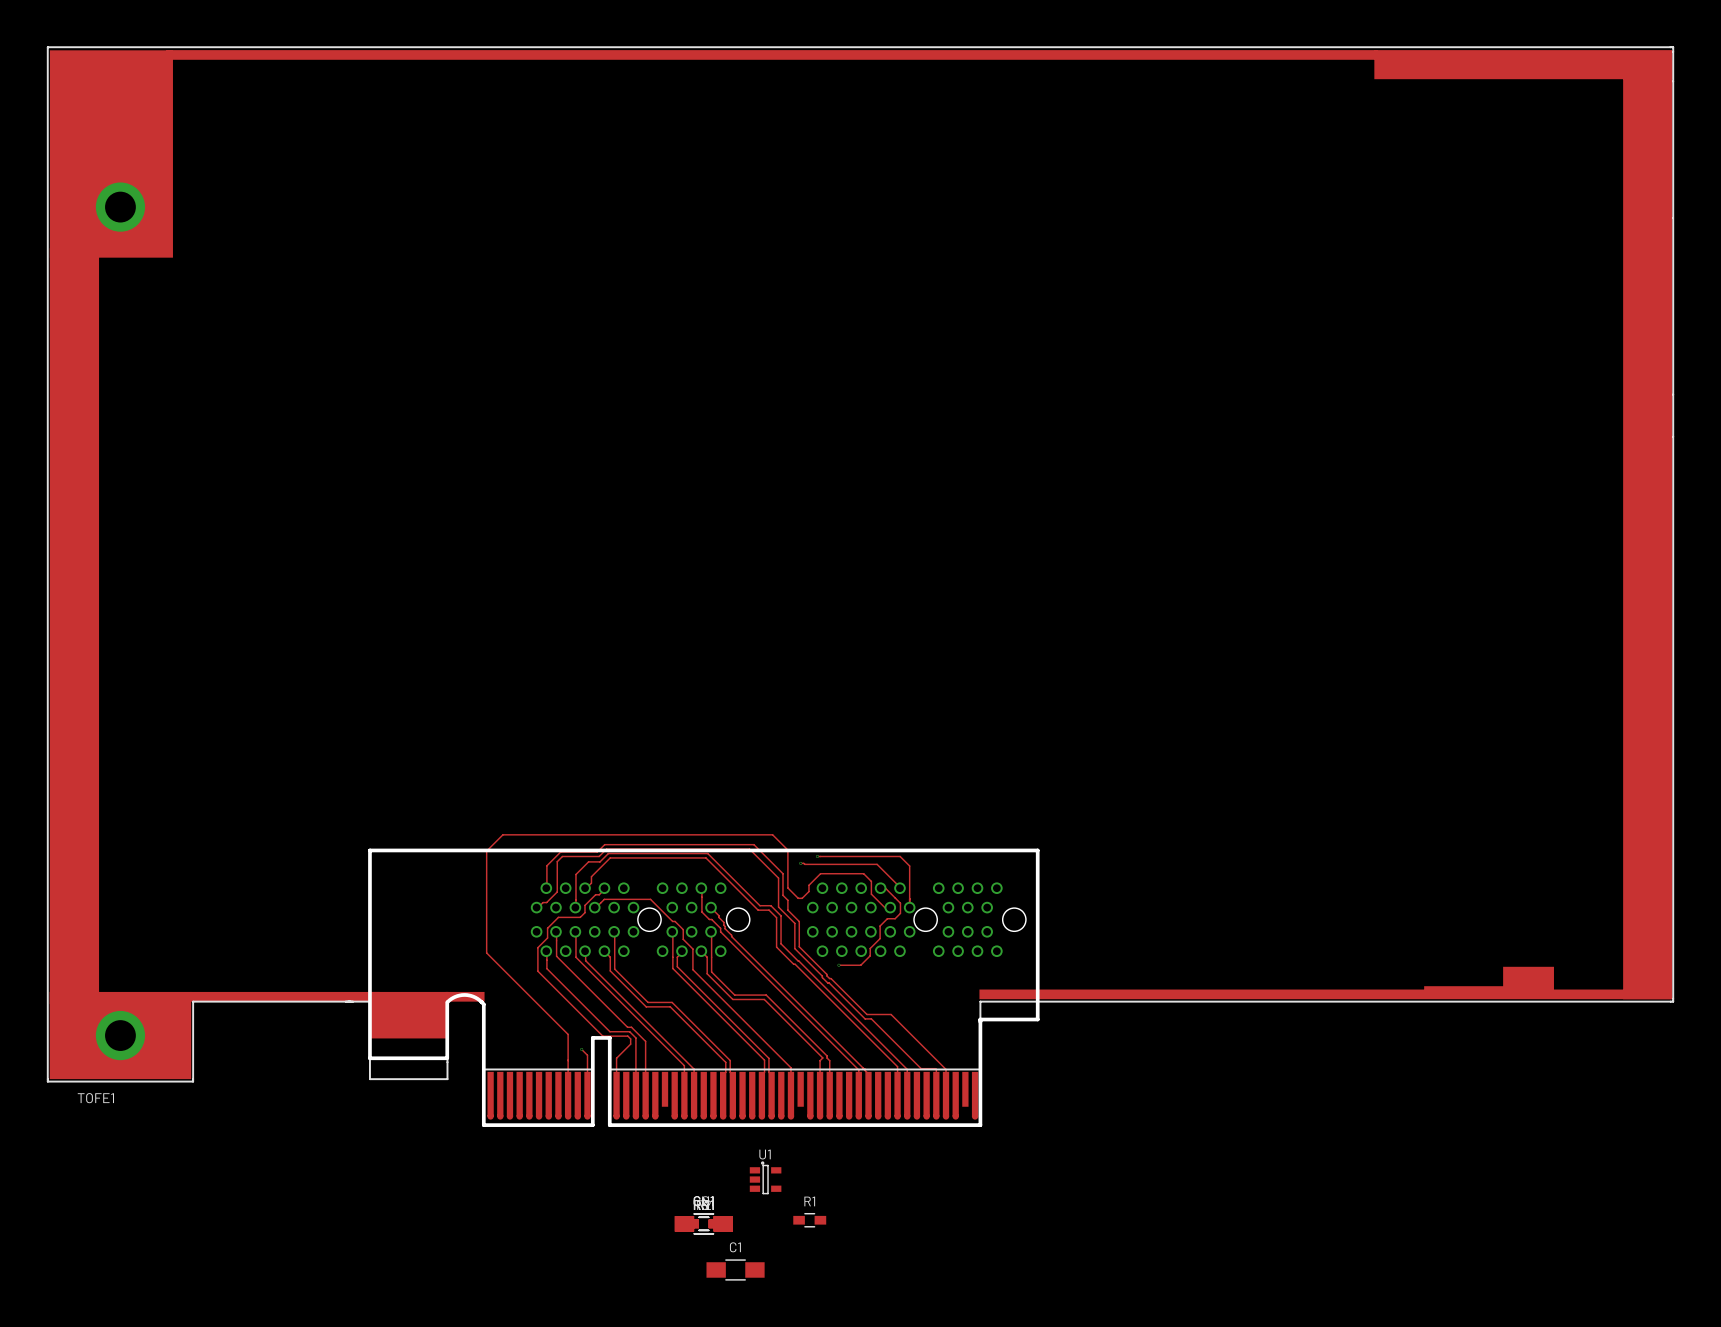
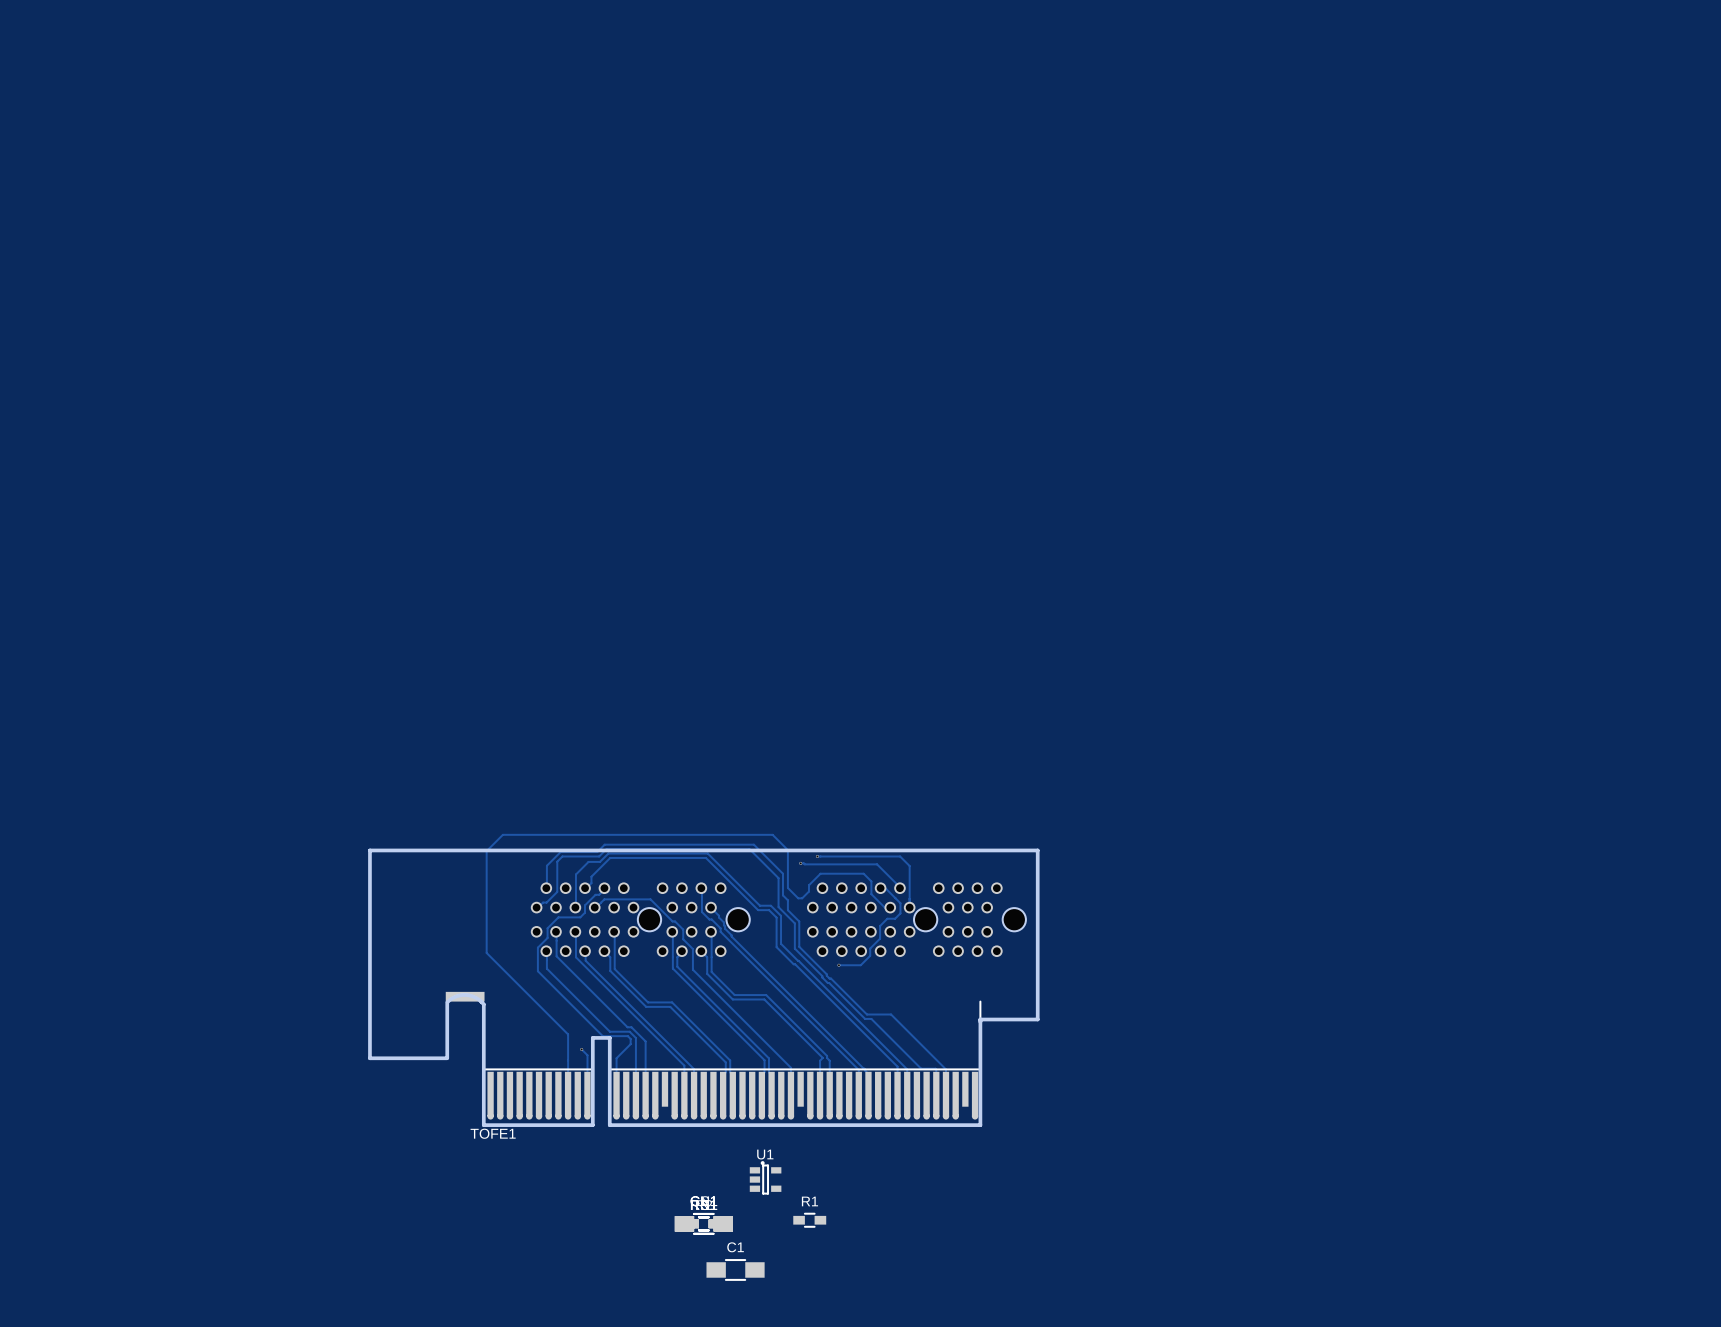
TOFE1 footprint: [46, 46, 1675, 1127] -> [445, 991, 982, 1127]
TOFE1 name position: TOFE1 (95, 1098) -> TOFE1 (493, 1133)

